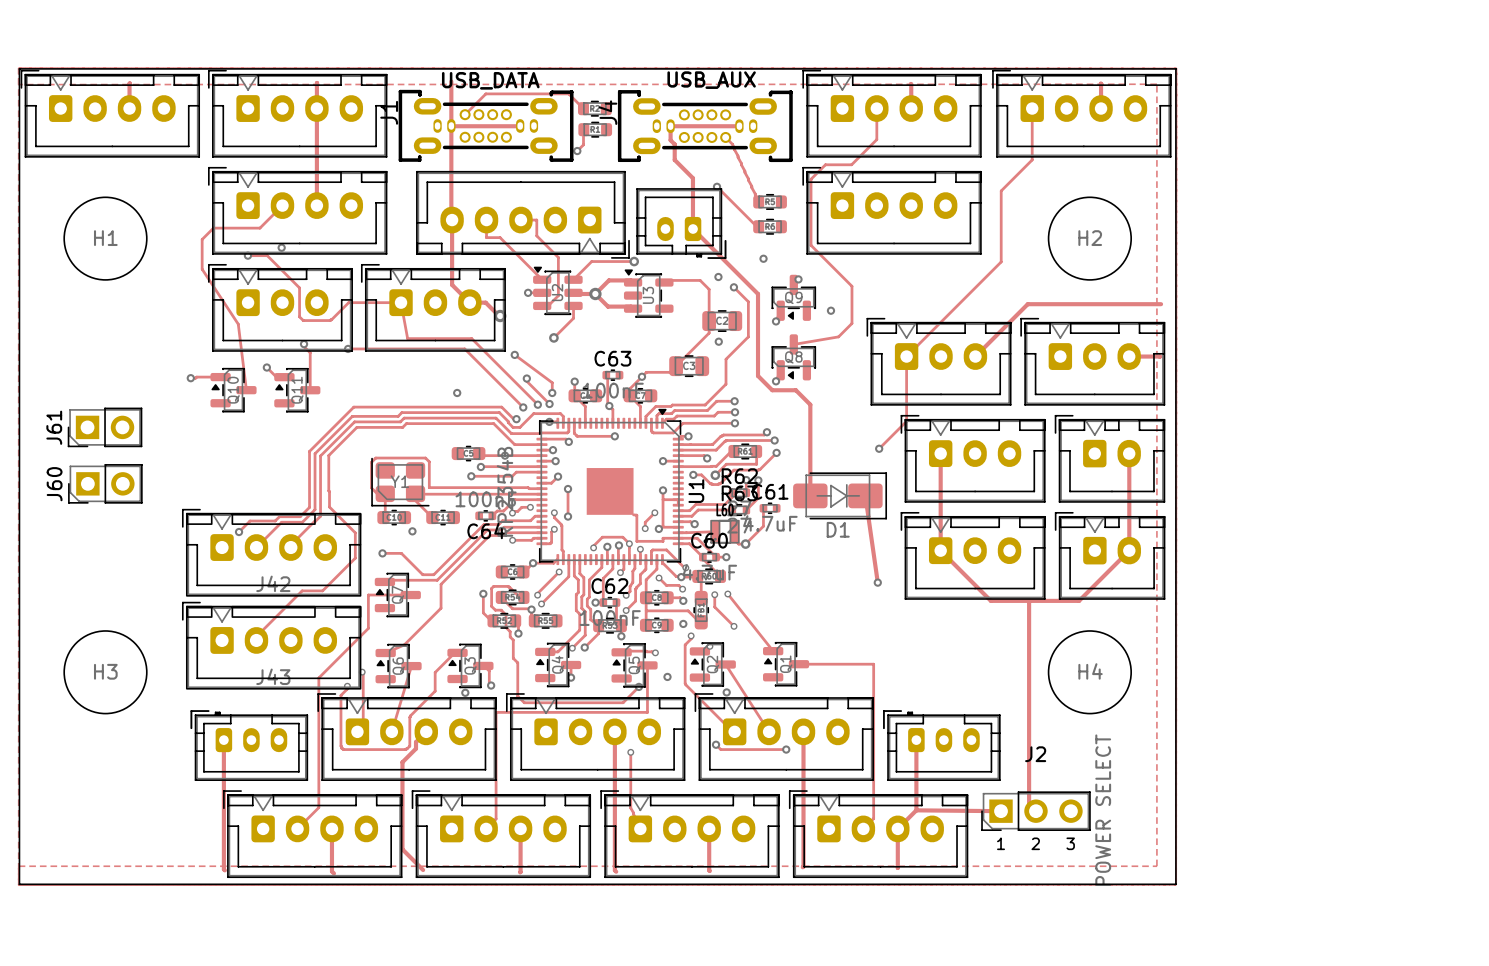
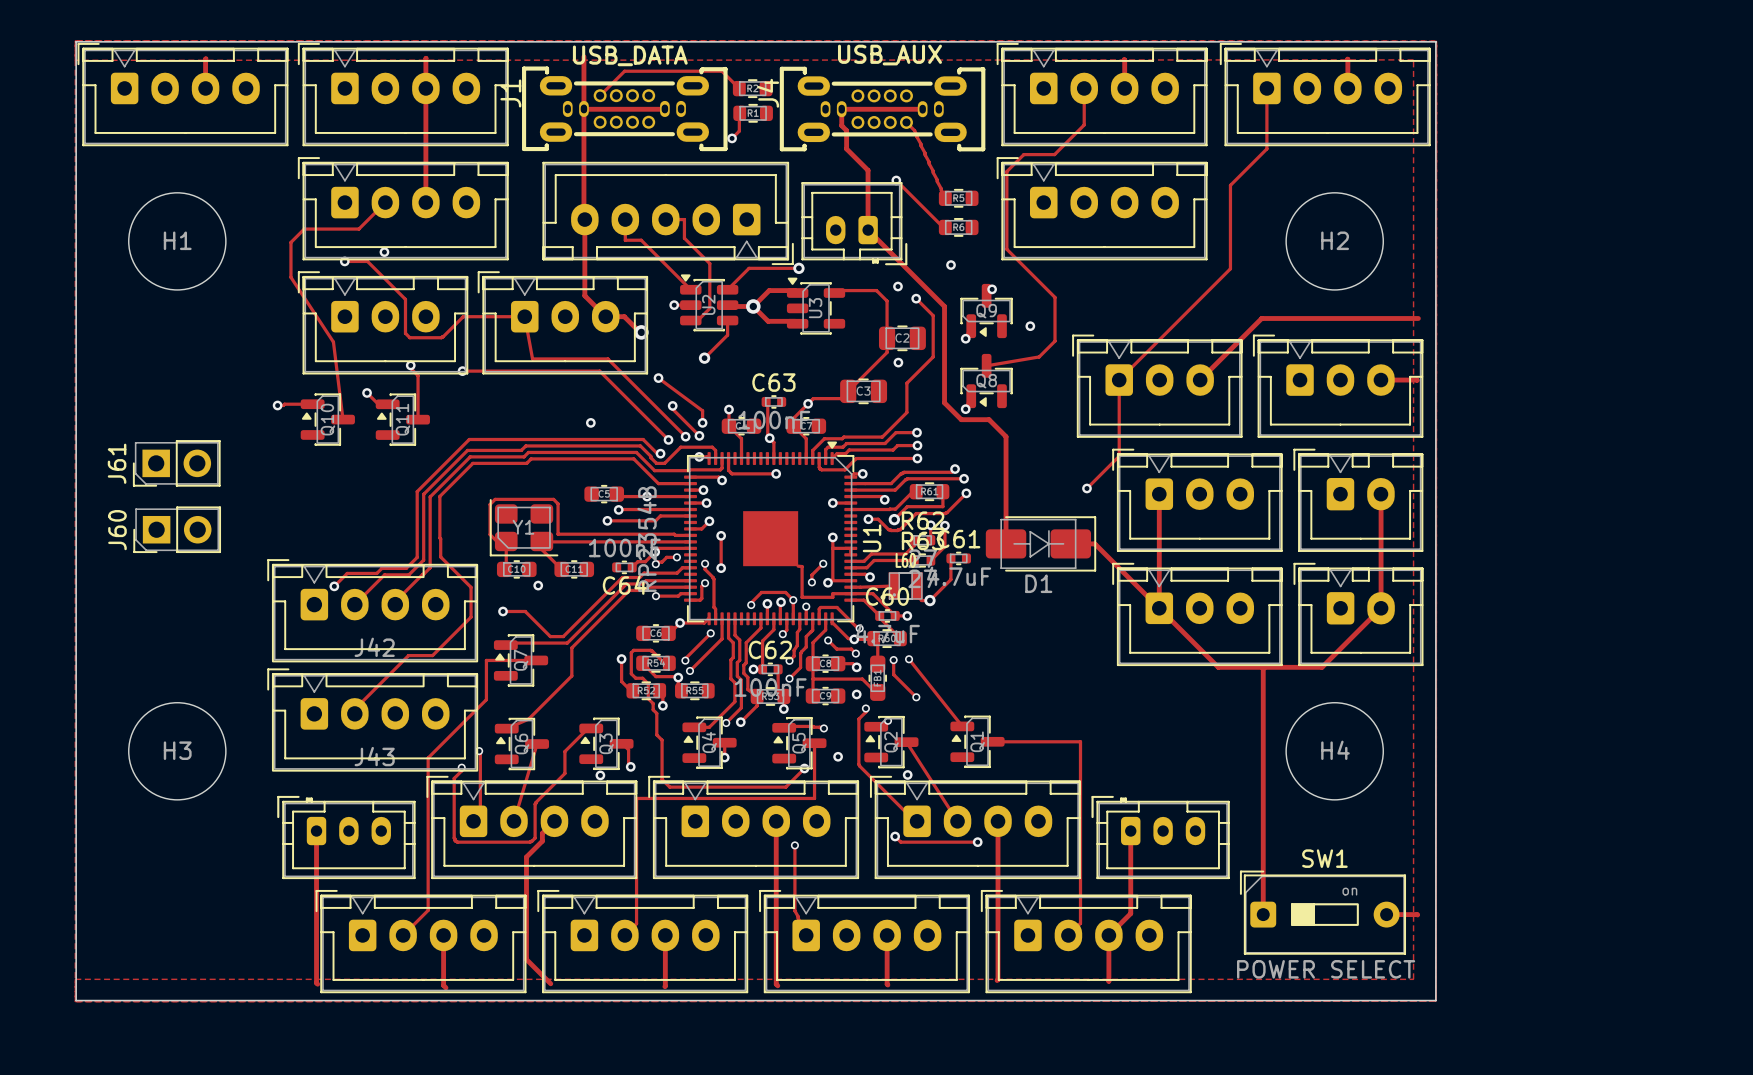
track: (865, 495) (877, 582) -> (1070, 543) (1094, 543) (1159, 608)
via: (877, 582) -> none
SW1: none -> POWER SELECT (1322, 912)
track: (916, 810) (1001, 811) -> none
J2: POWER SELECT (1035, 811) -> none
track: none -> (1386, 914) (1417, 915)
text: 1 (1001, 843) -> none
text: 2 (1035, 843) -> none
text: 3 (1070, 843) -> none

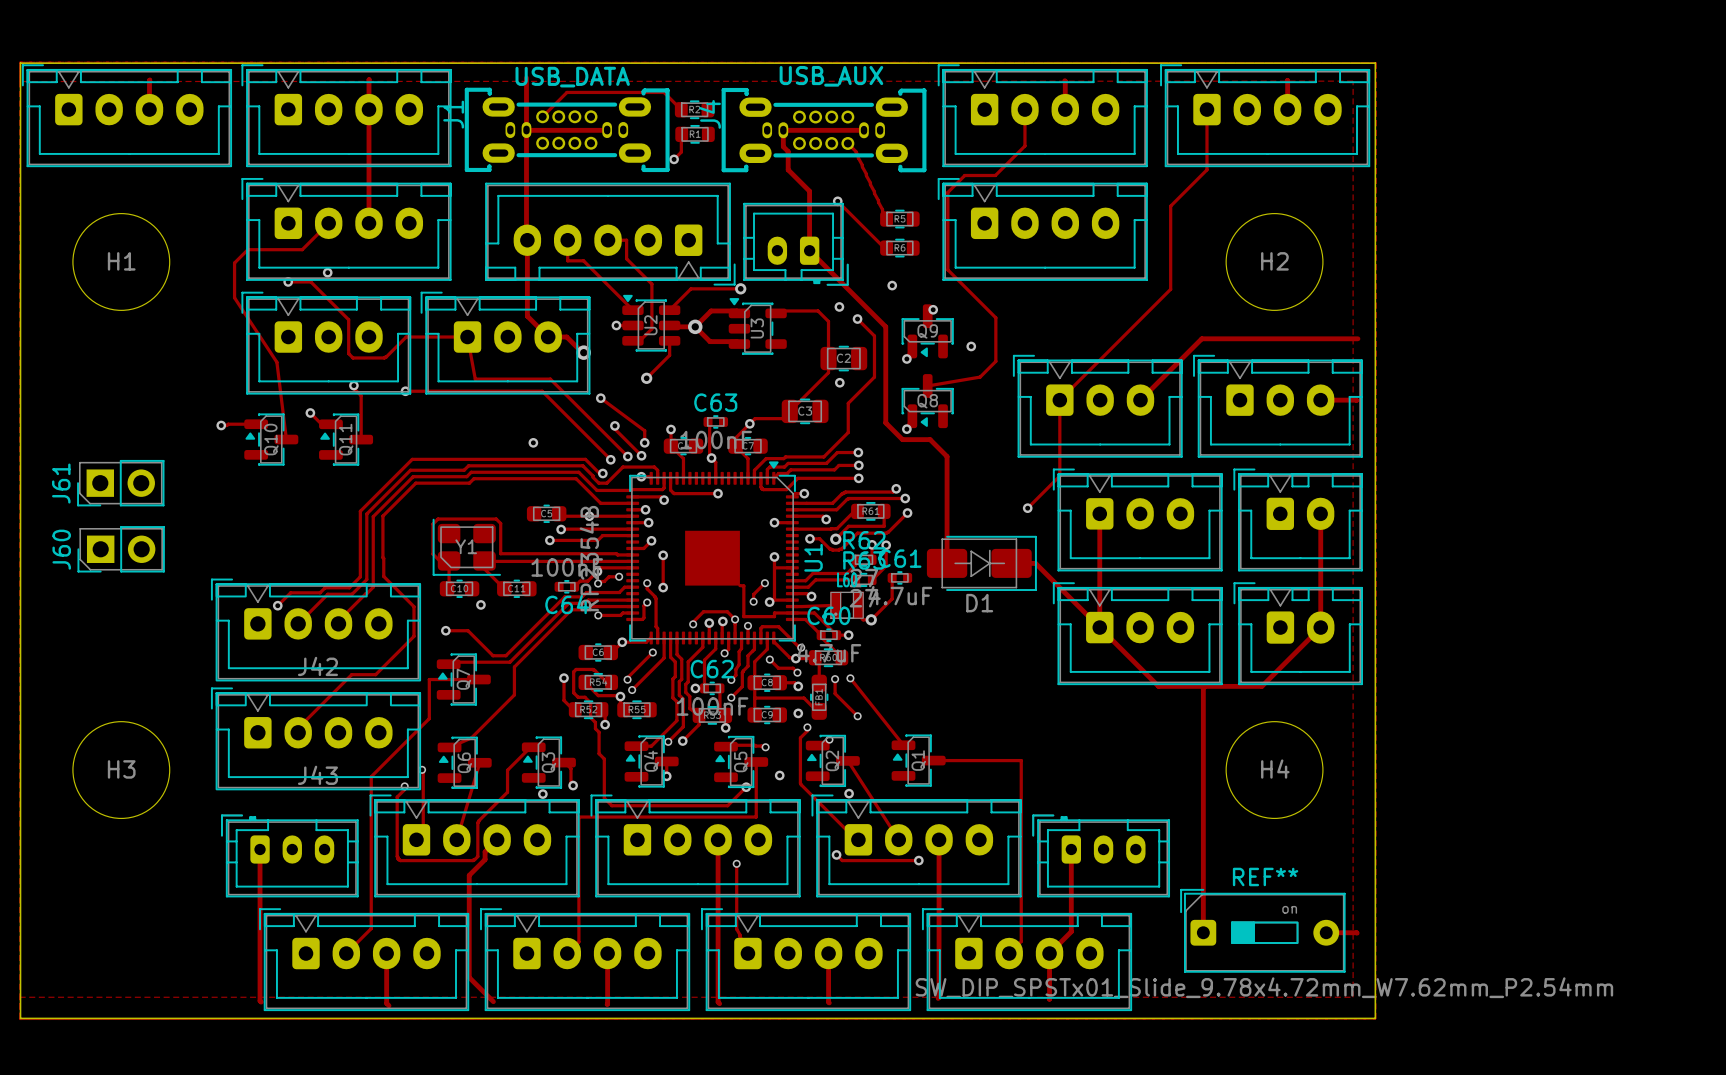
SW1 name: SW1 (1324, 858) -> REF** (1265, 876)
SW1 value: POWER SELECT (1326, 969) -> SW_DIP_SPSTx01_Slide_9.78x4.72mm_W7.62mm_P2.54mm (1264, 987)

